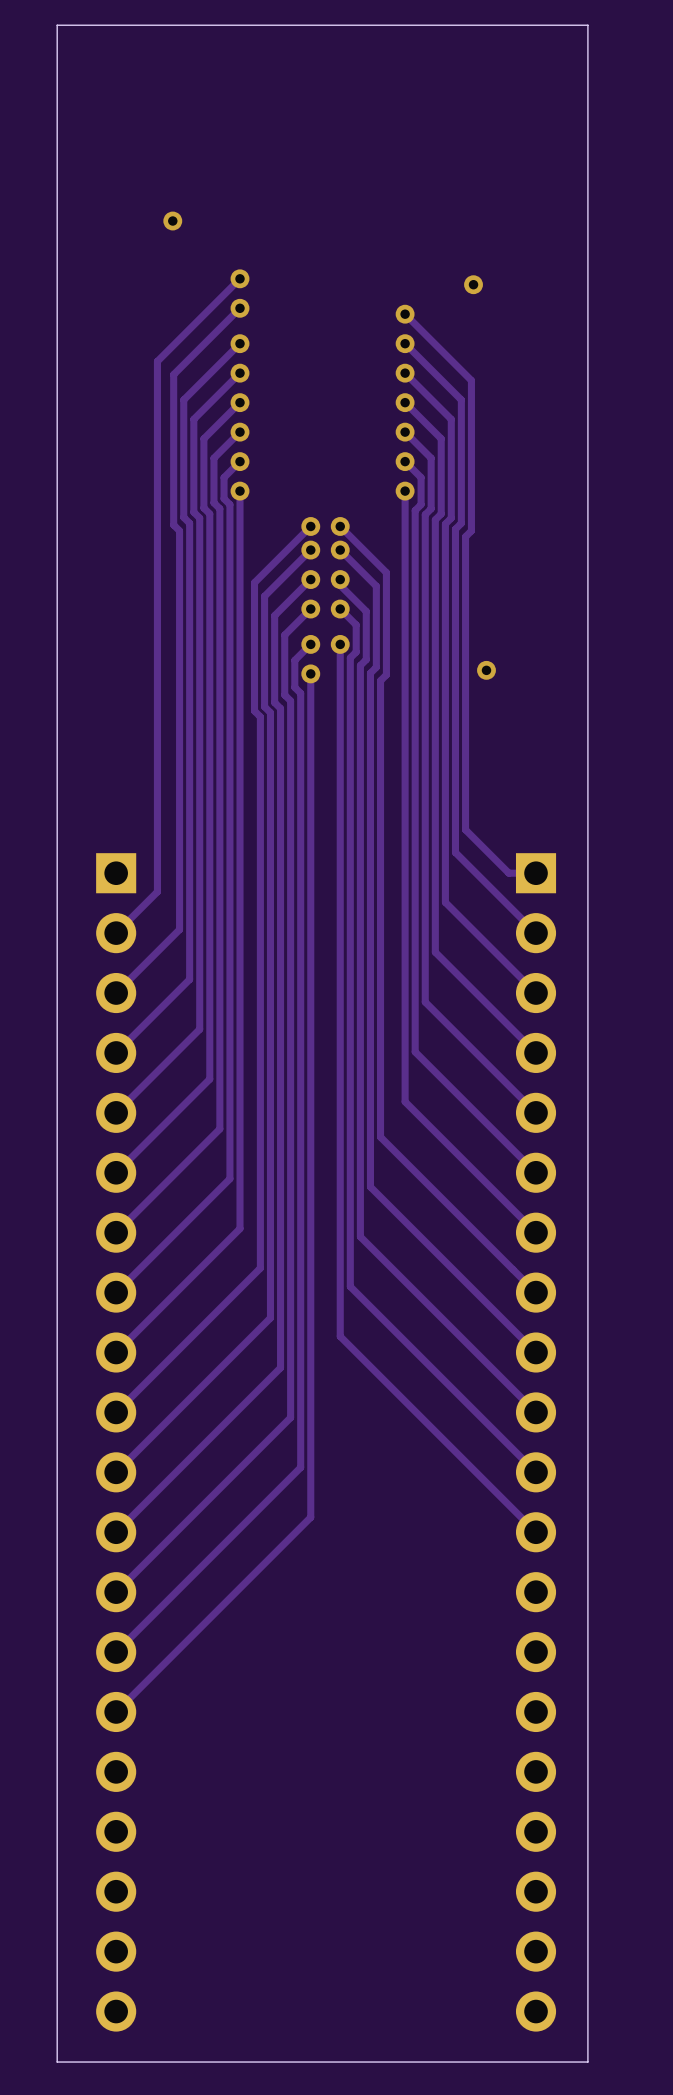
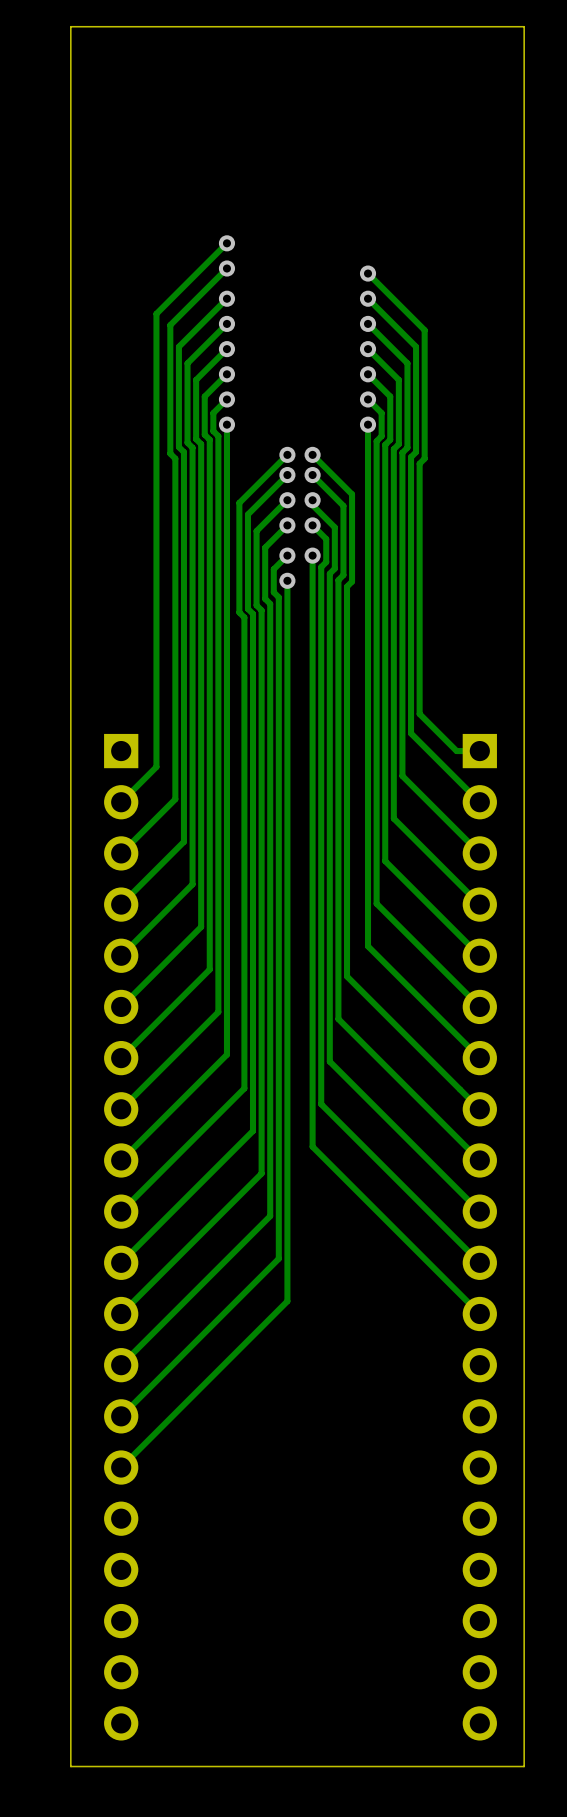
via: (172, 221) -> none
via: (473, 284) -> none
via: (486, 670) -> none

